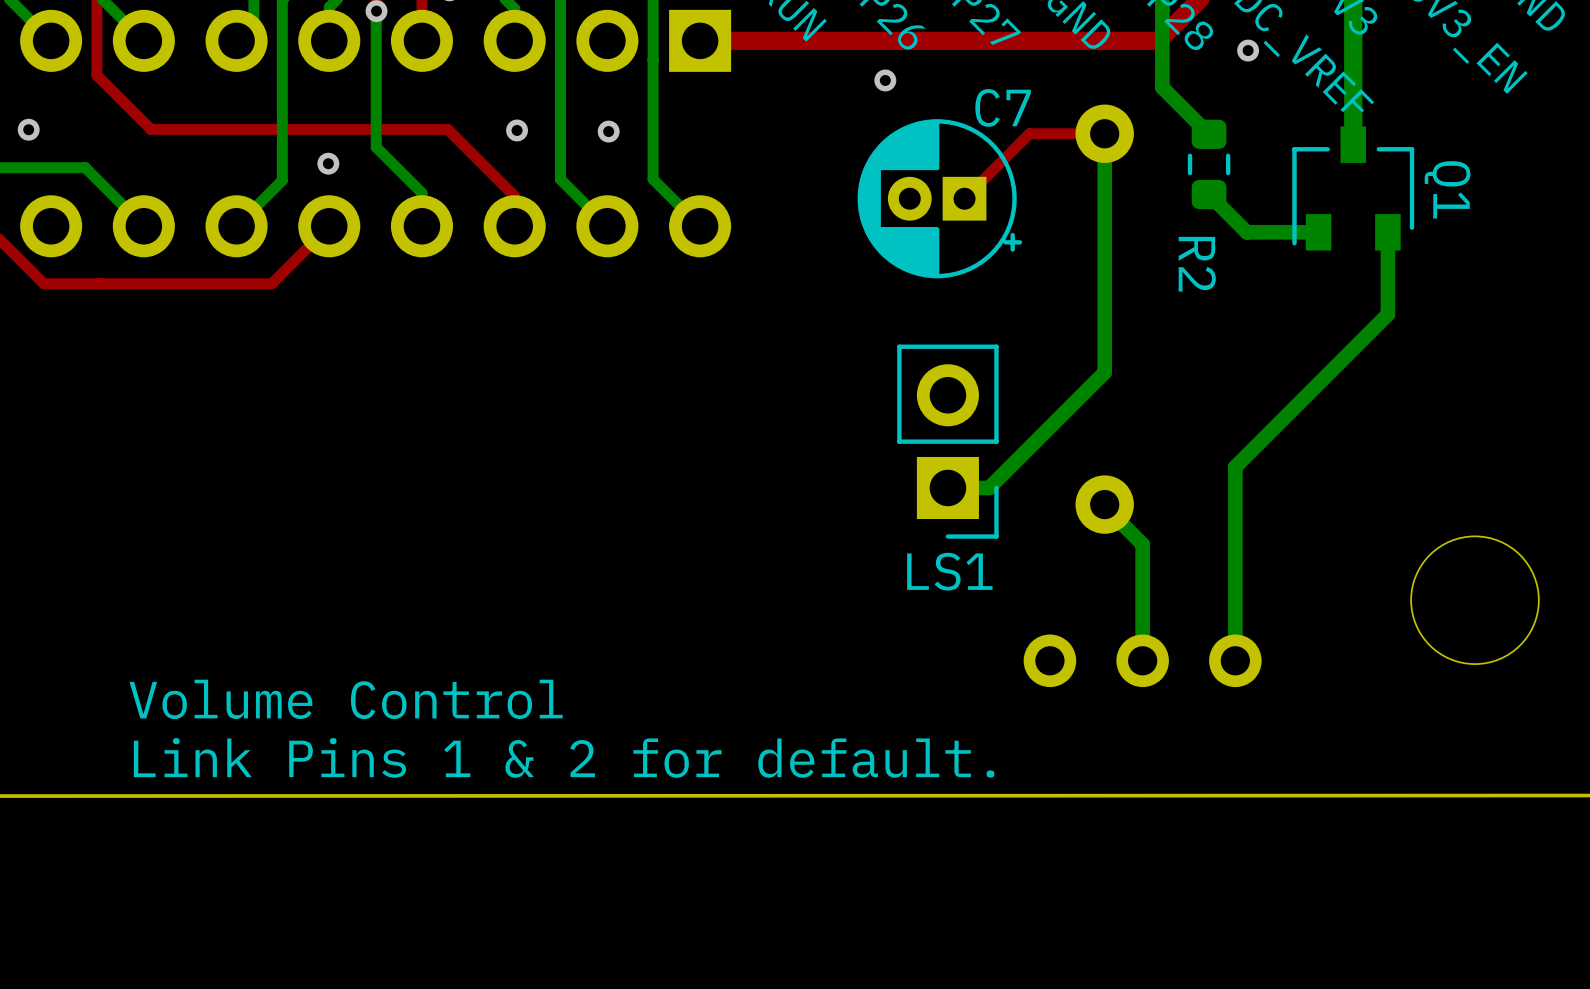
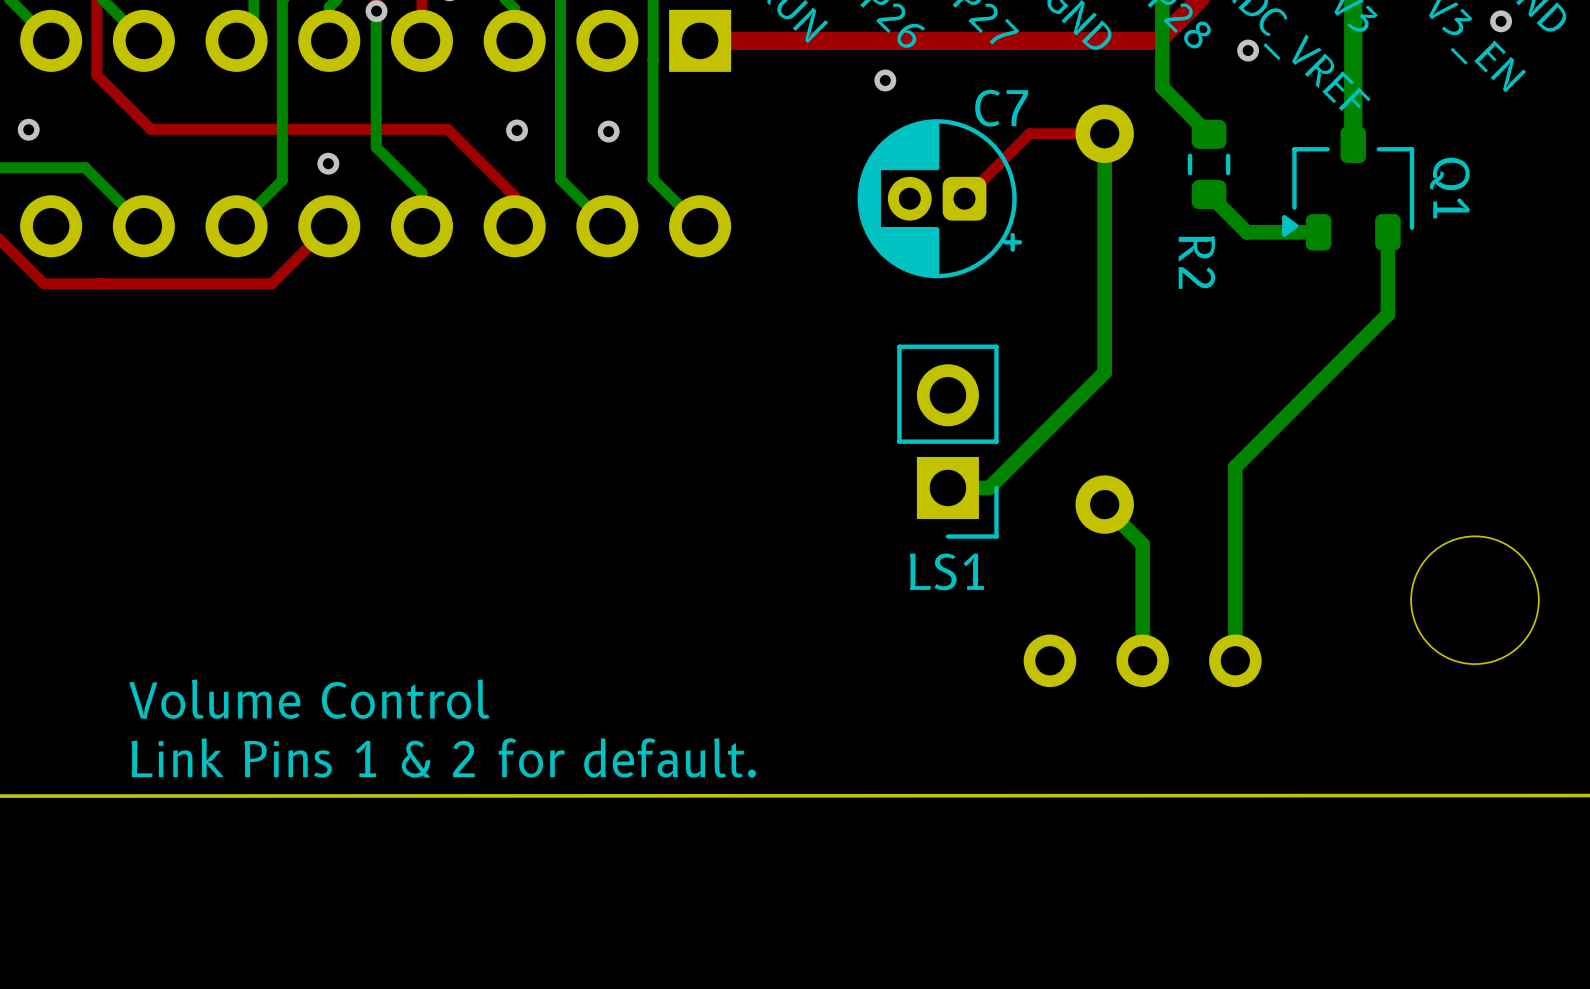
via: none -> (1501, 21)
C7 footprint: [857, 119, 1023, 279] -> [857, 119, 1023, 279]
Q1 footprint: [1292, 126, 1415, 251] -> [1282, 126, 1415, 251]

